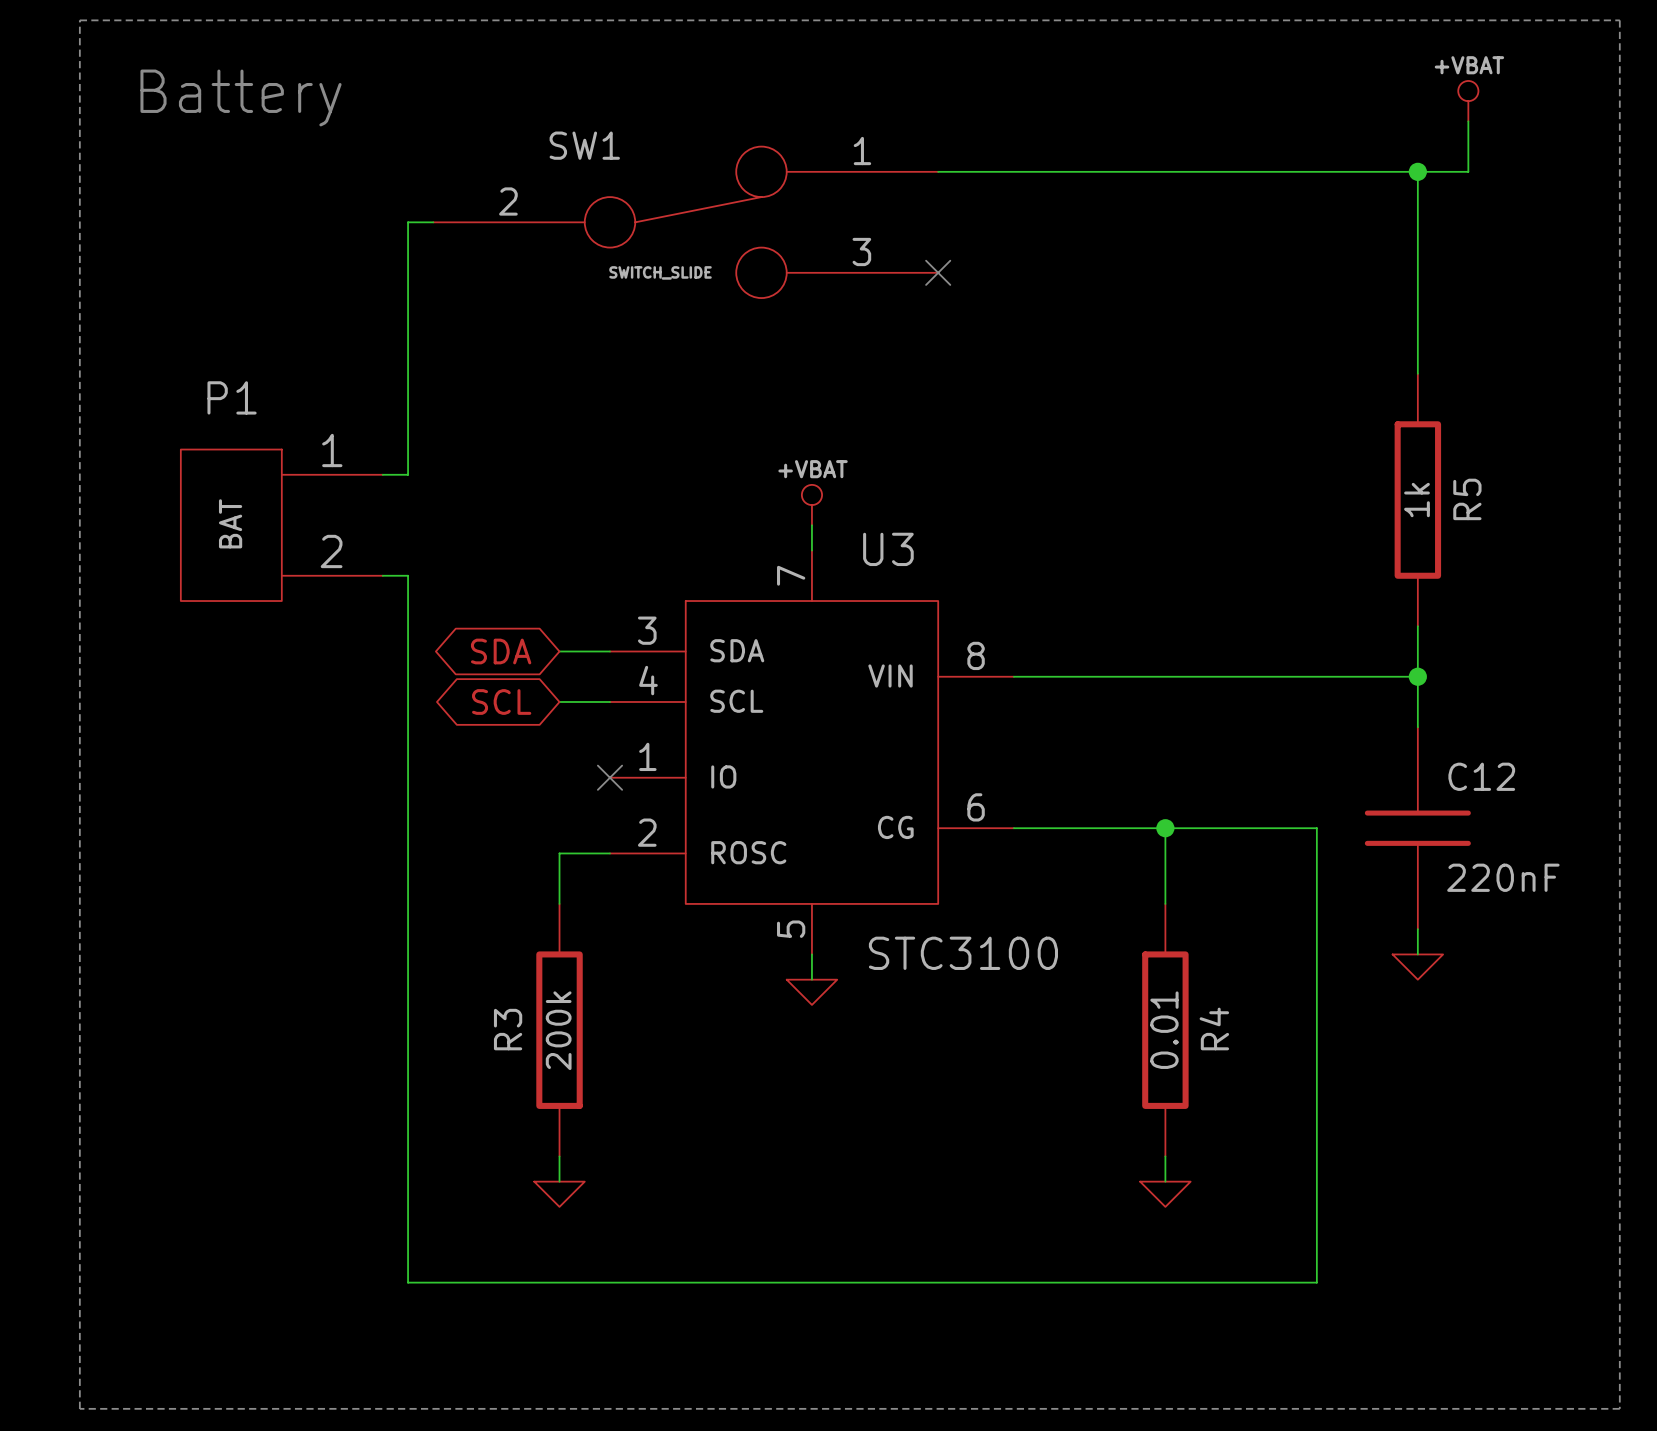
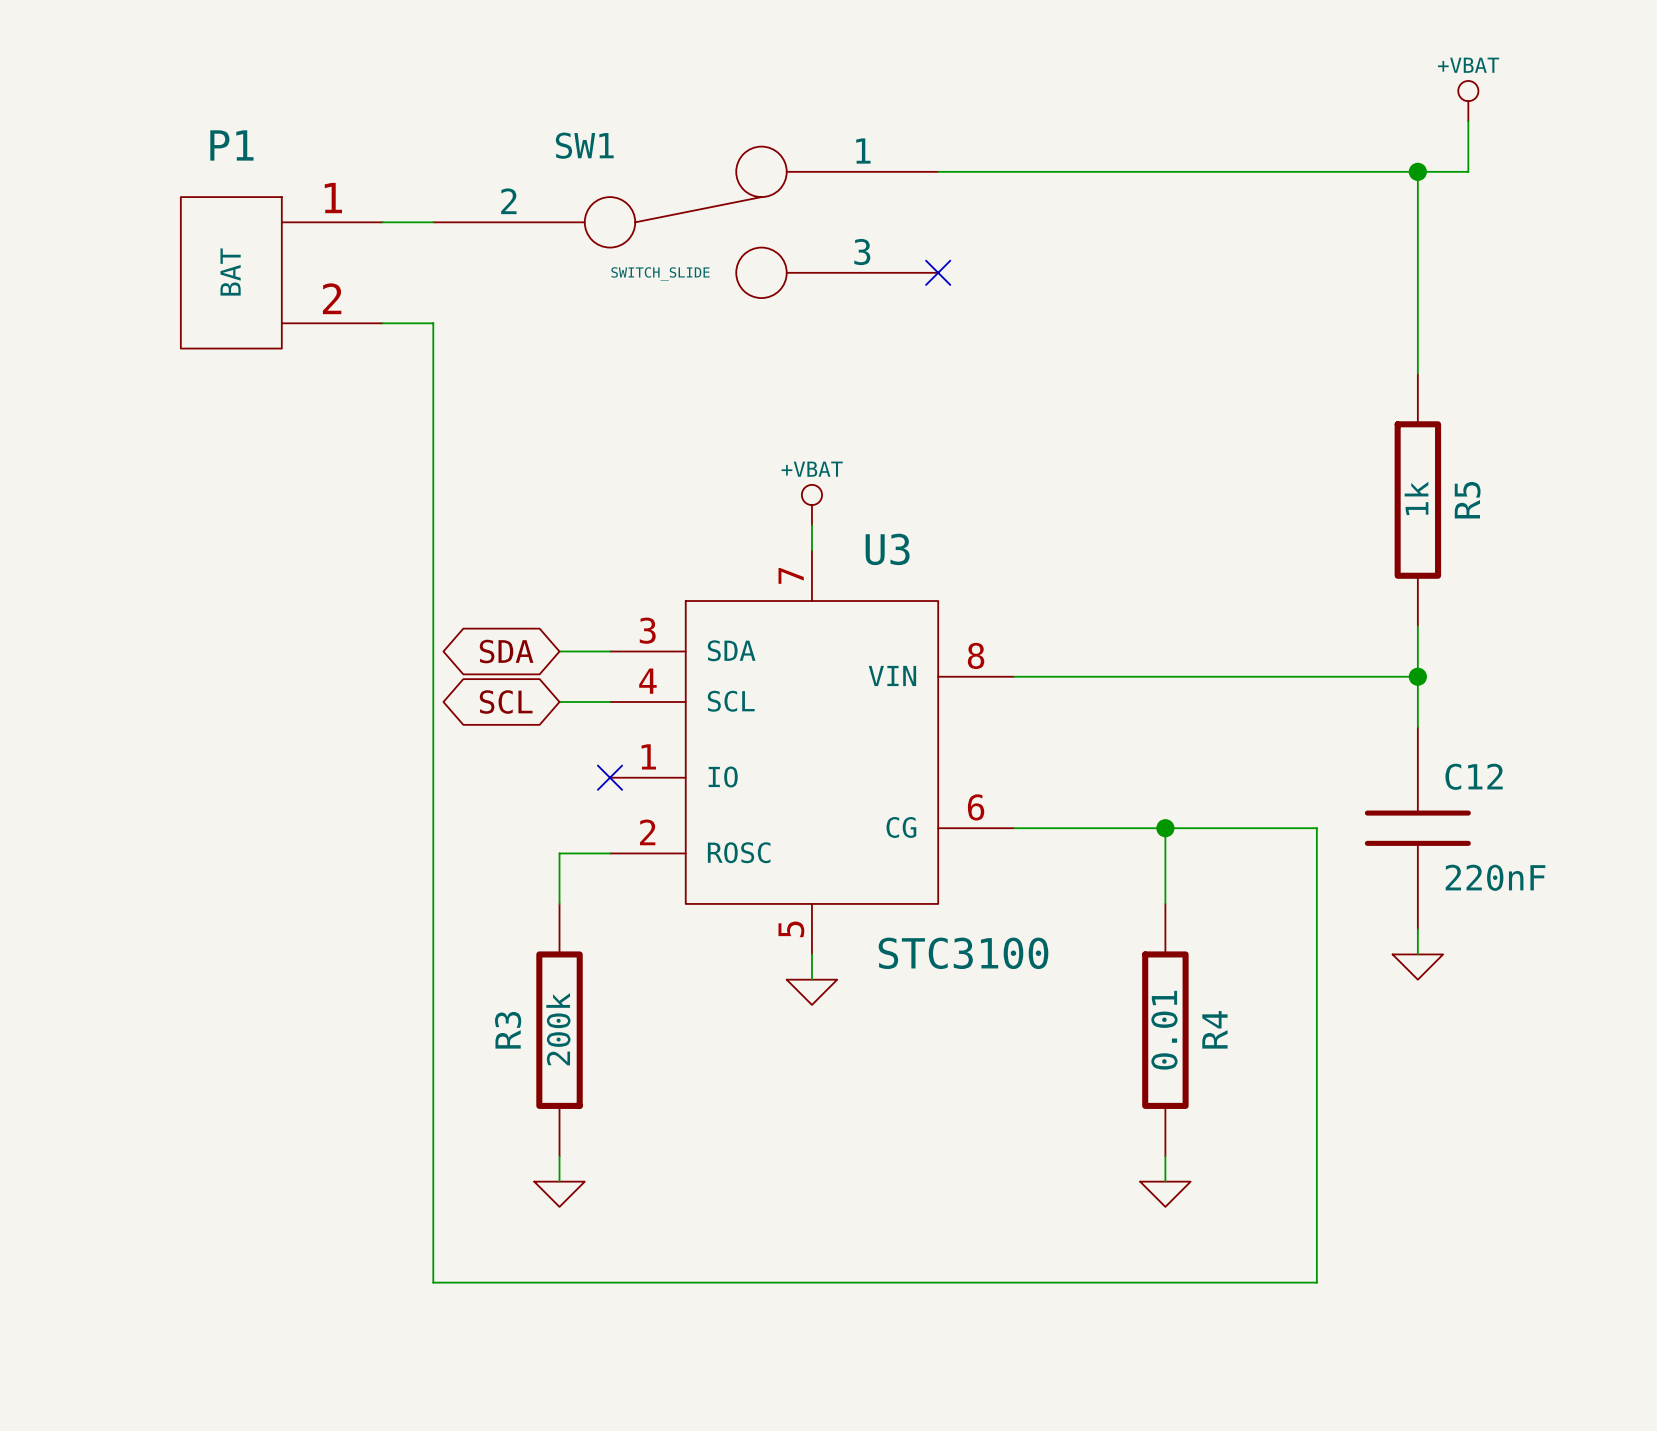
line: (79, 20) (79, 1408) (1619, 1408) (1619, 20) (79, 20) -> none
text: Battery (241, 97) -> none
wire: (408, 222) (408, 474) (382, 474) -> (408, 222) (382, 222)
P1 position: (281, 525) -> (281, 272)
wire: (382, 575) (408, 575) (408, 1282) (433, 1282) -> (382, 323) (433, 323) (433, 1282)

